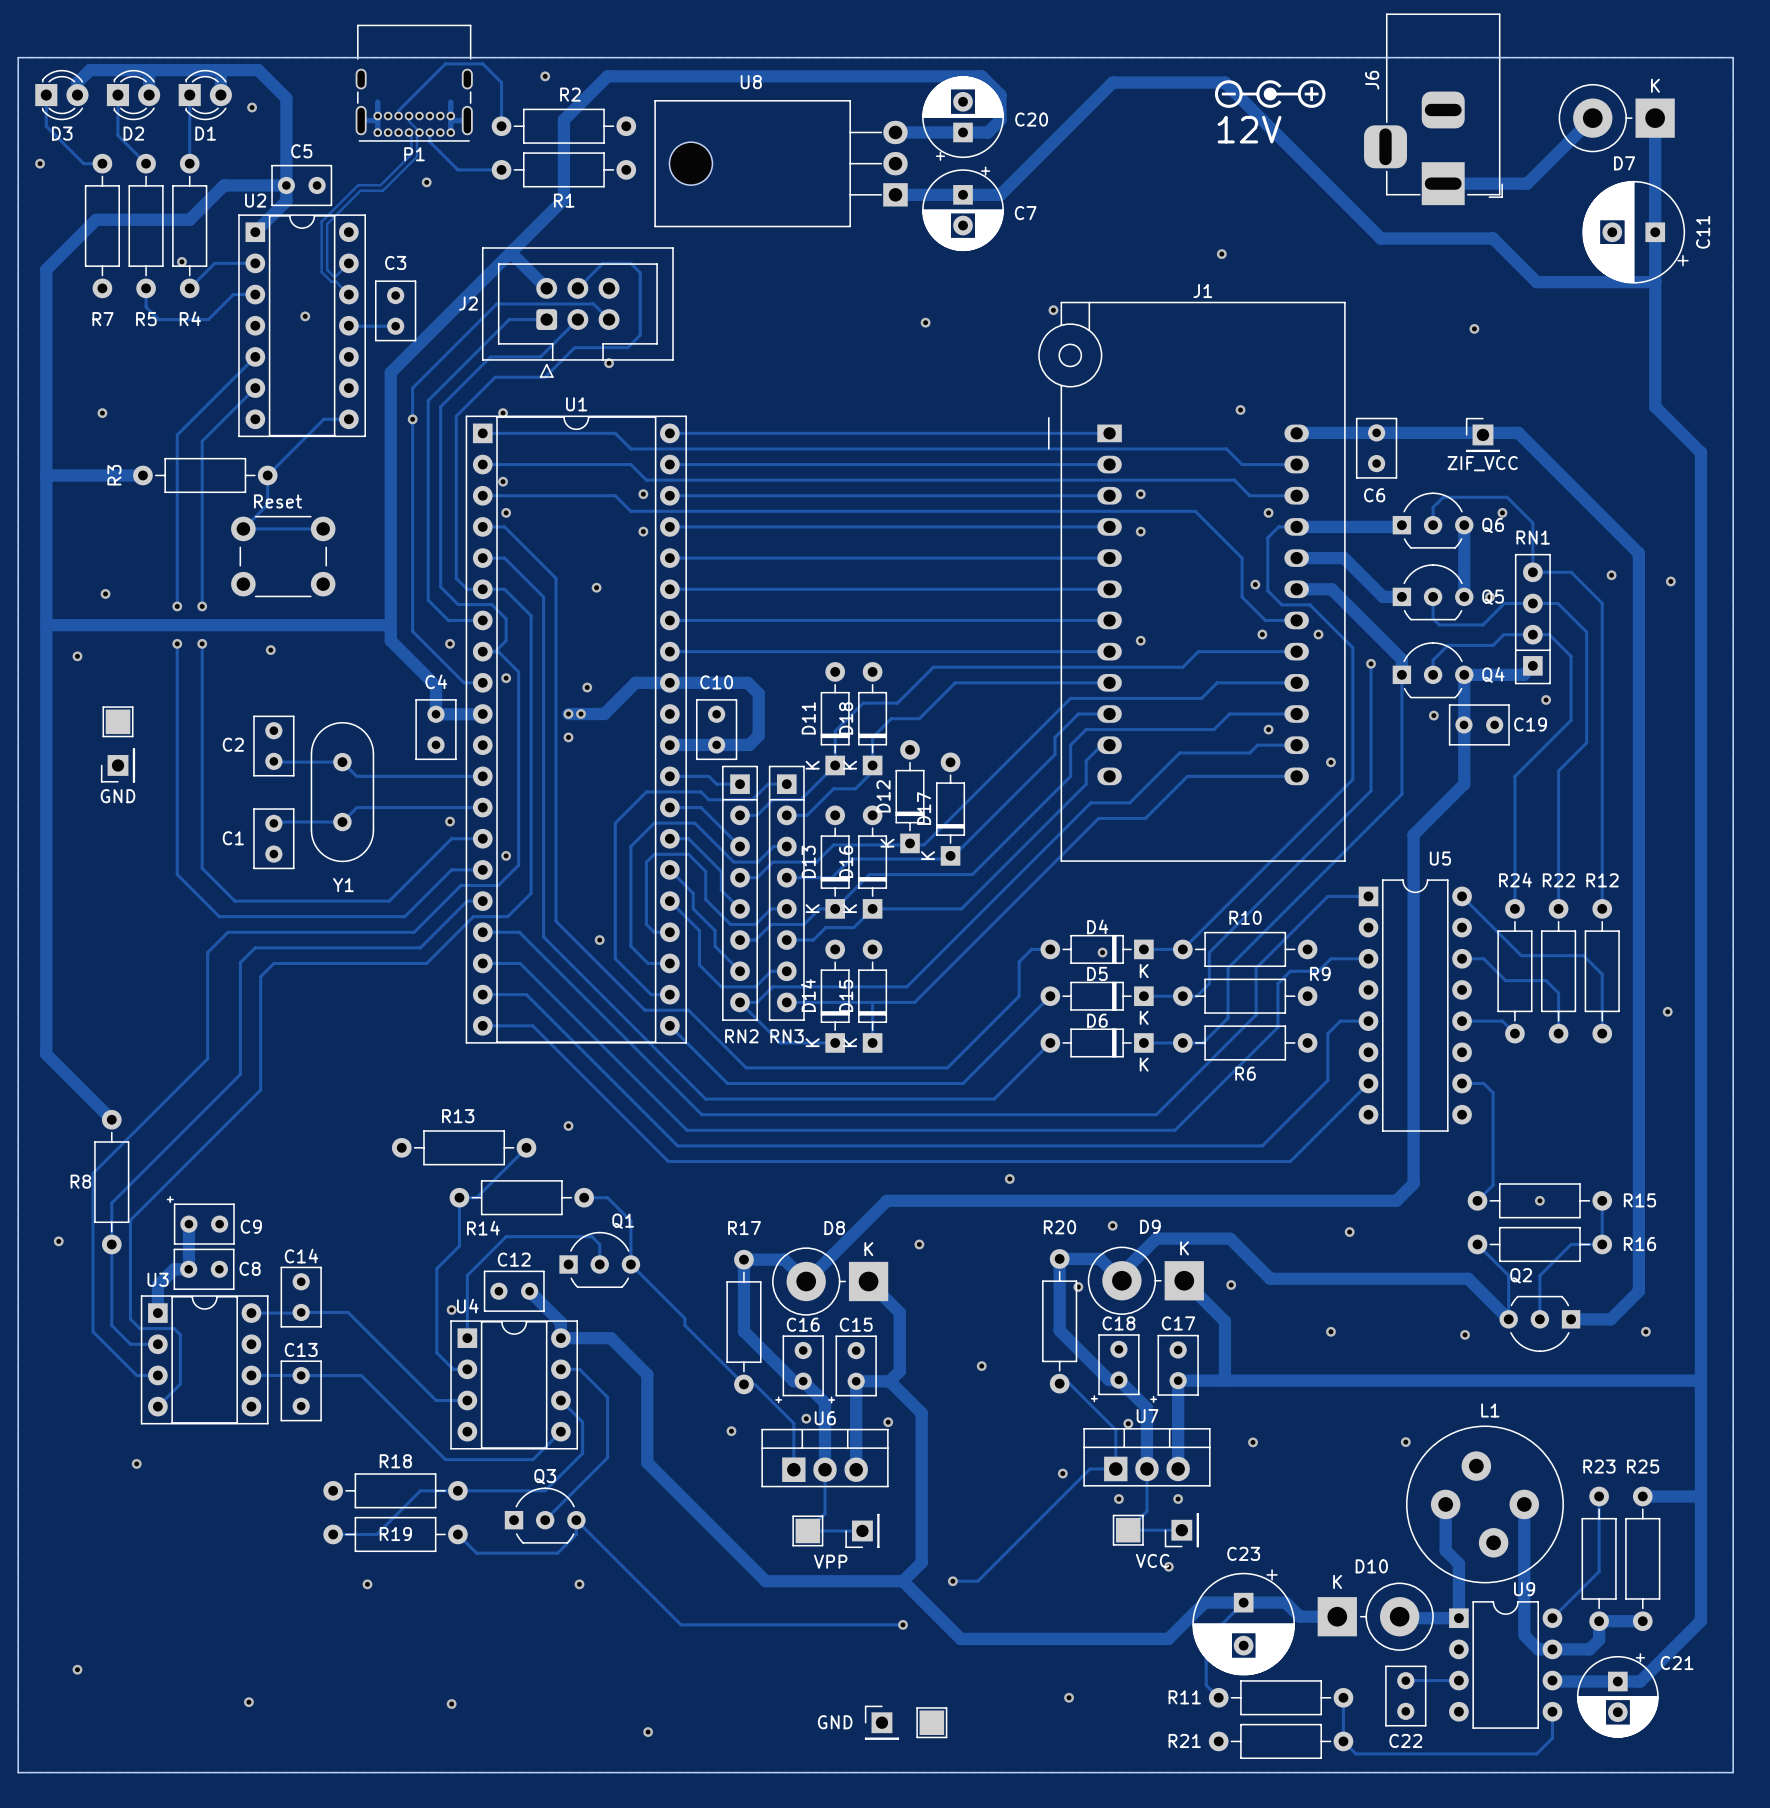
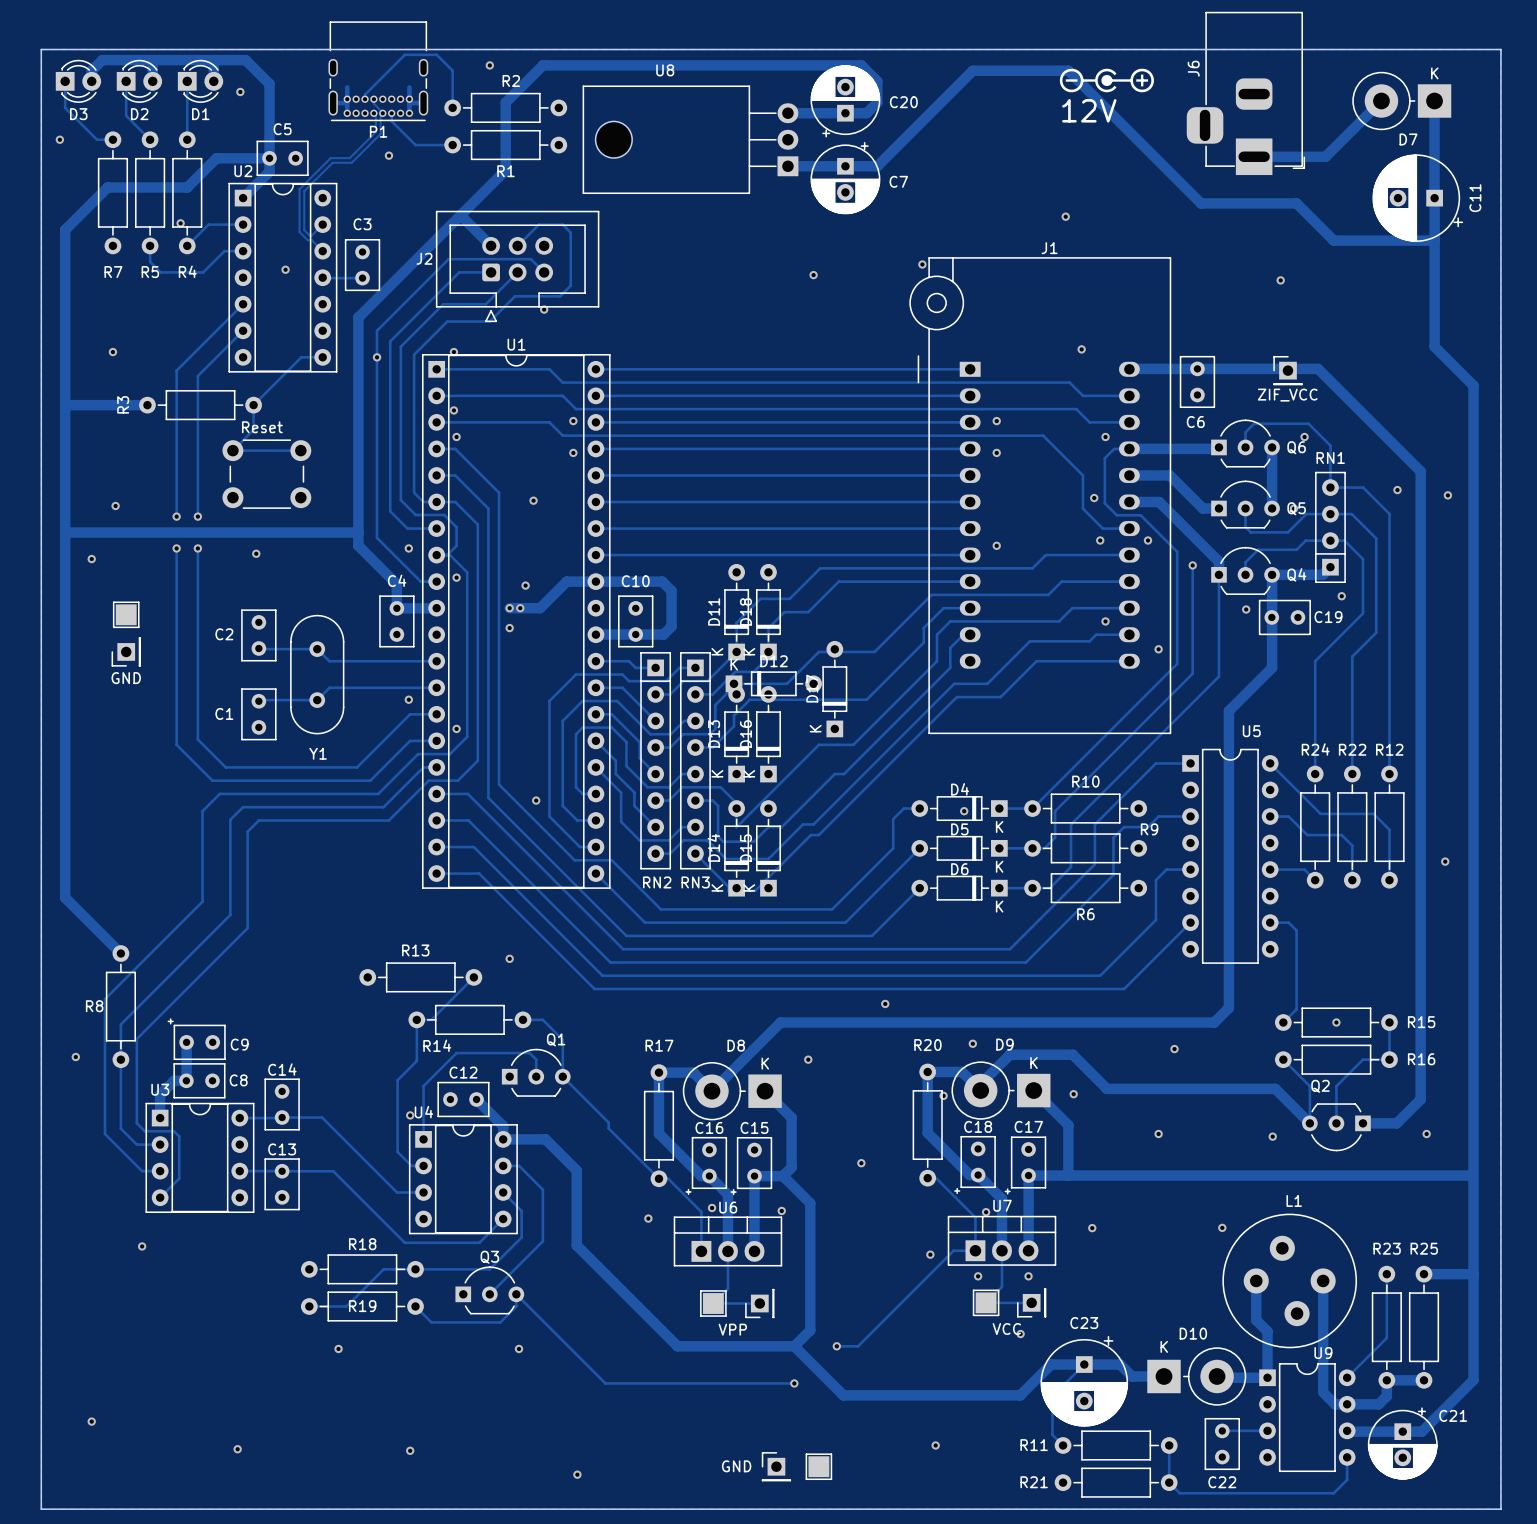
track: (1070, 698) (924, 844) (833, 844) (816, 862) (804, 862) -> (937, 594) (931, 594) (874, 651) (818, 651) (787, 683) (733, 683) (733, 686) (715, 705) (715, 728) (710, 734)
D12 rotation: 0° (910, 796) -> 90° clockwise (773, 683)
track: (1098, 818) (914, 1002) (786, 1002) -> (960, 697) (956, 697) (818, 835) (810, 835) (755, 890) (728, 890) (728, 886)
track: (987, 821) (950, 859) (850, 859) (832, 877) (807, 877) -> (866, 699) (749, 699) (733, 715) (733, 726) (712, 747)
track: (931, 874) (869, 874) (835, 908) (819, 908) (804, 924) -> (818, 744) (736, 827) (736, 803) (720, 787) (710, 787)
track: (950, 908) (872, 908) (853, 927) (825, 927) (813, 940) (807, 940) -> (834, 774) (781, 827) (768, 827) (753, 841) (723, 841) (718, 836) (718, 805) (712, 800)
track: (925, 968) (906, 986) (800, 986) -> (813, 824) (802, 824) (768, 858) (726, 858) (707, 840)
track: (740, 1002) (780, 1042) (835, 1042) -> none
track: none -> (695, 853) (732, 890)
track: (872, 1002) (872, 1042) -> none

